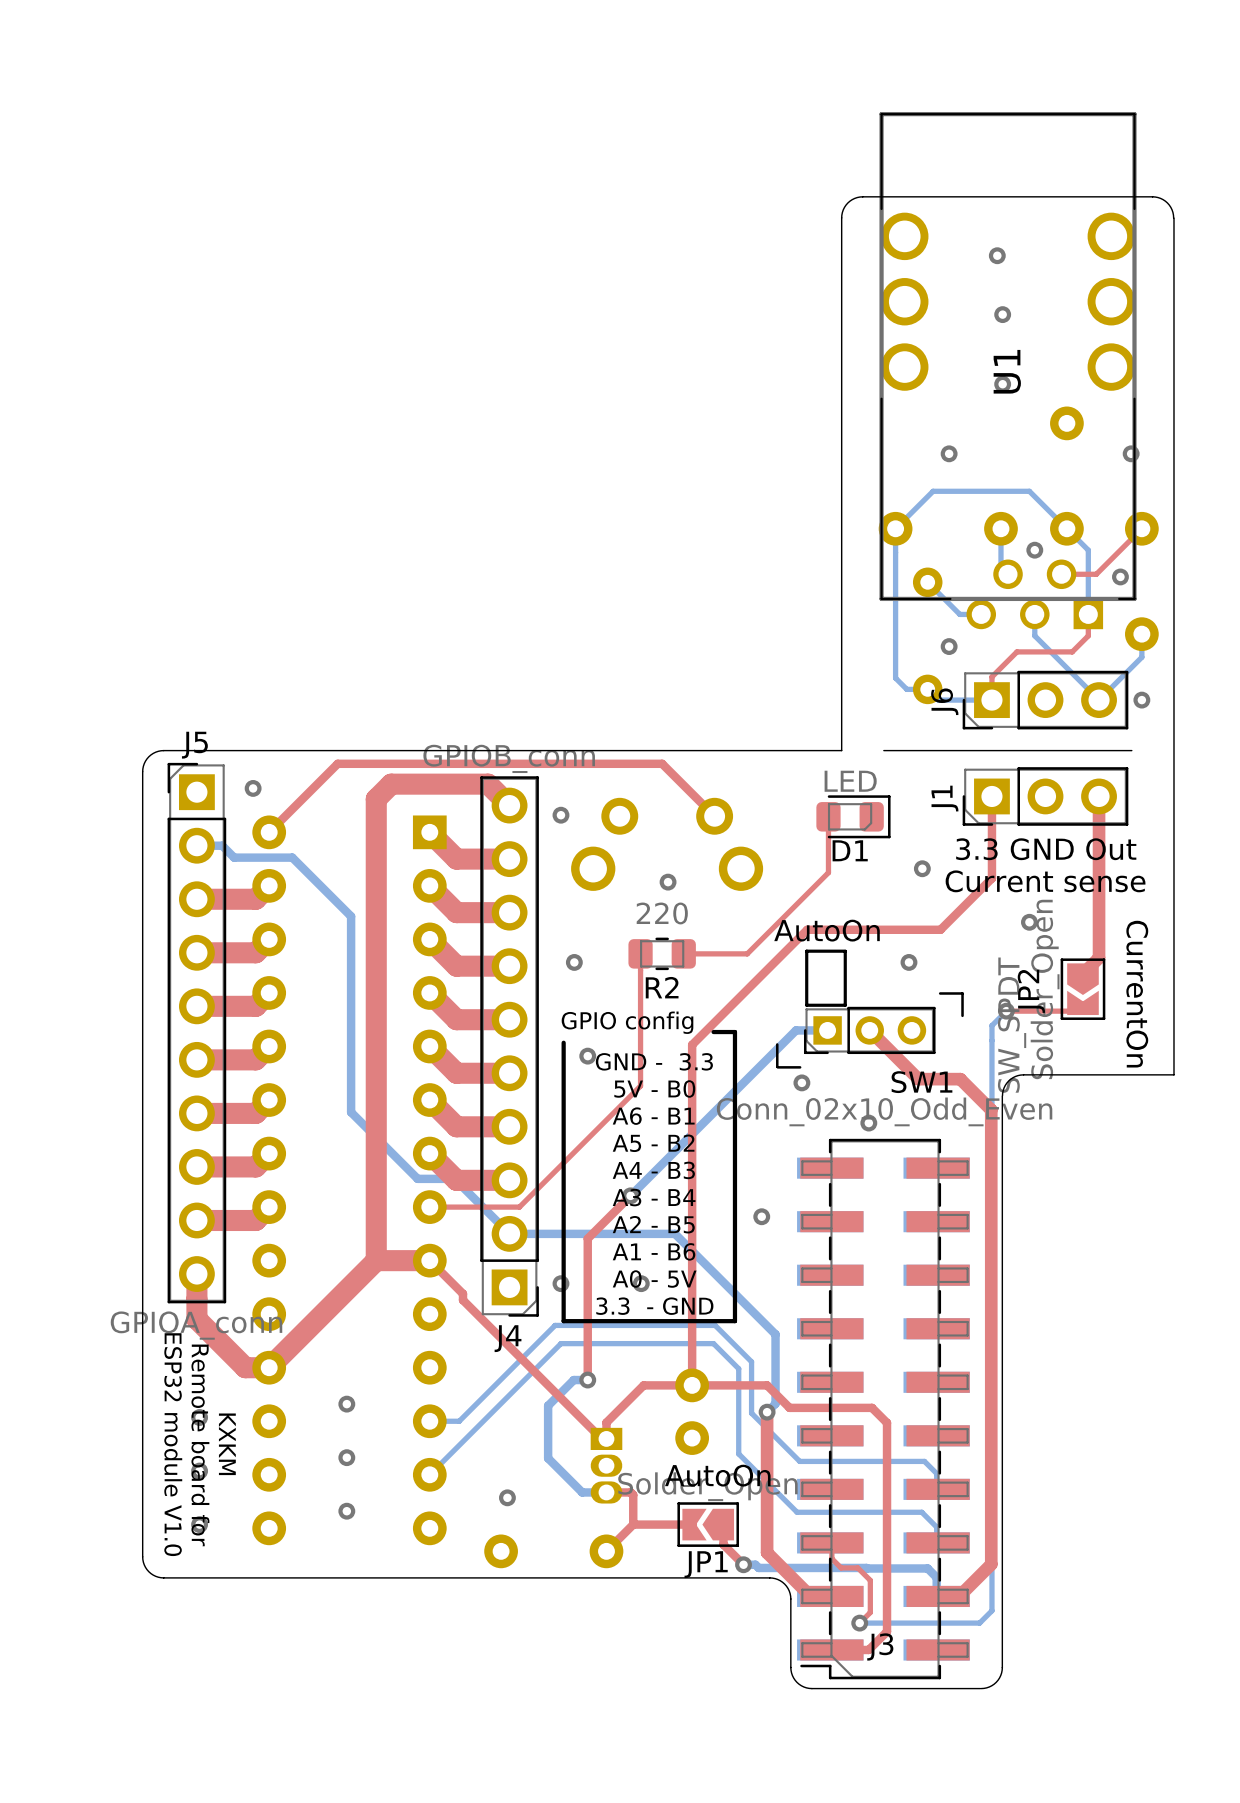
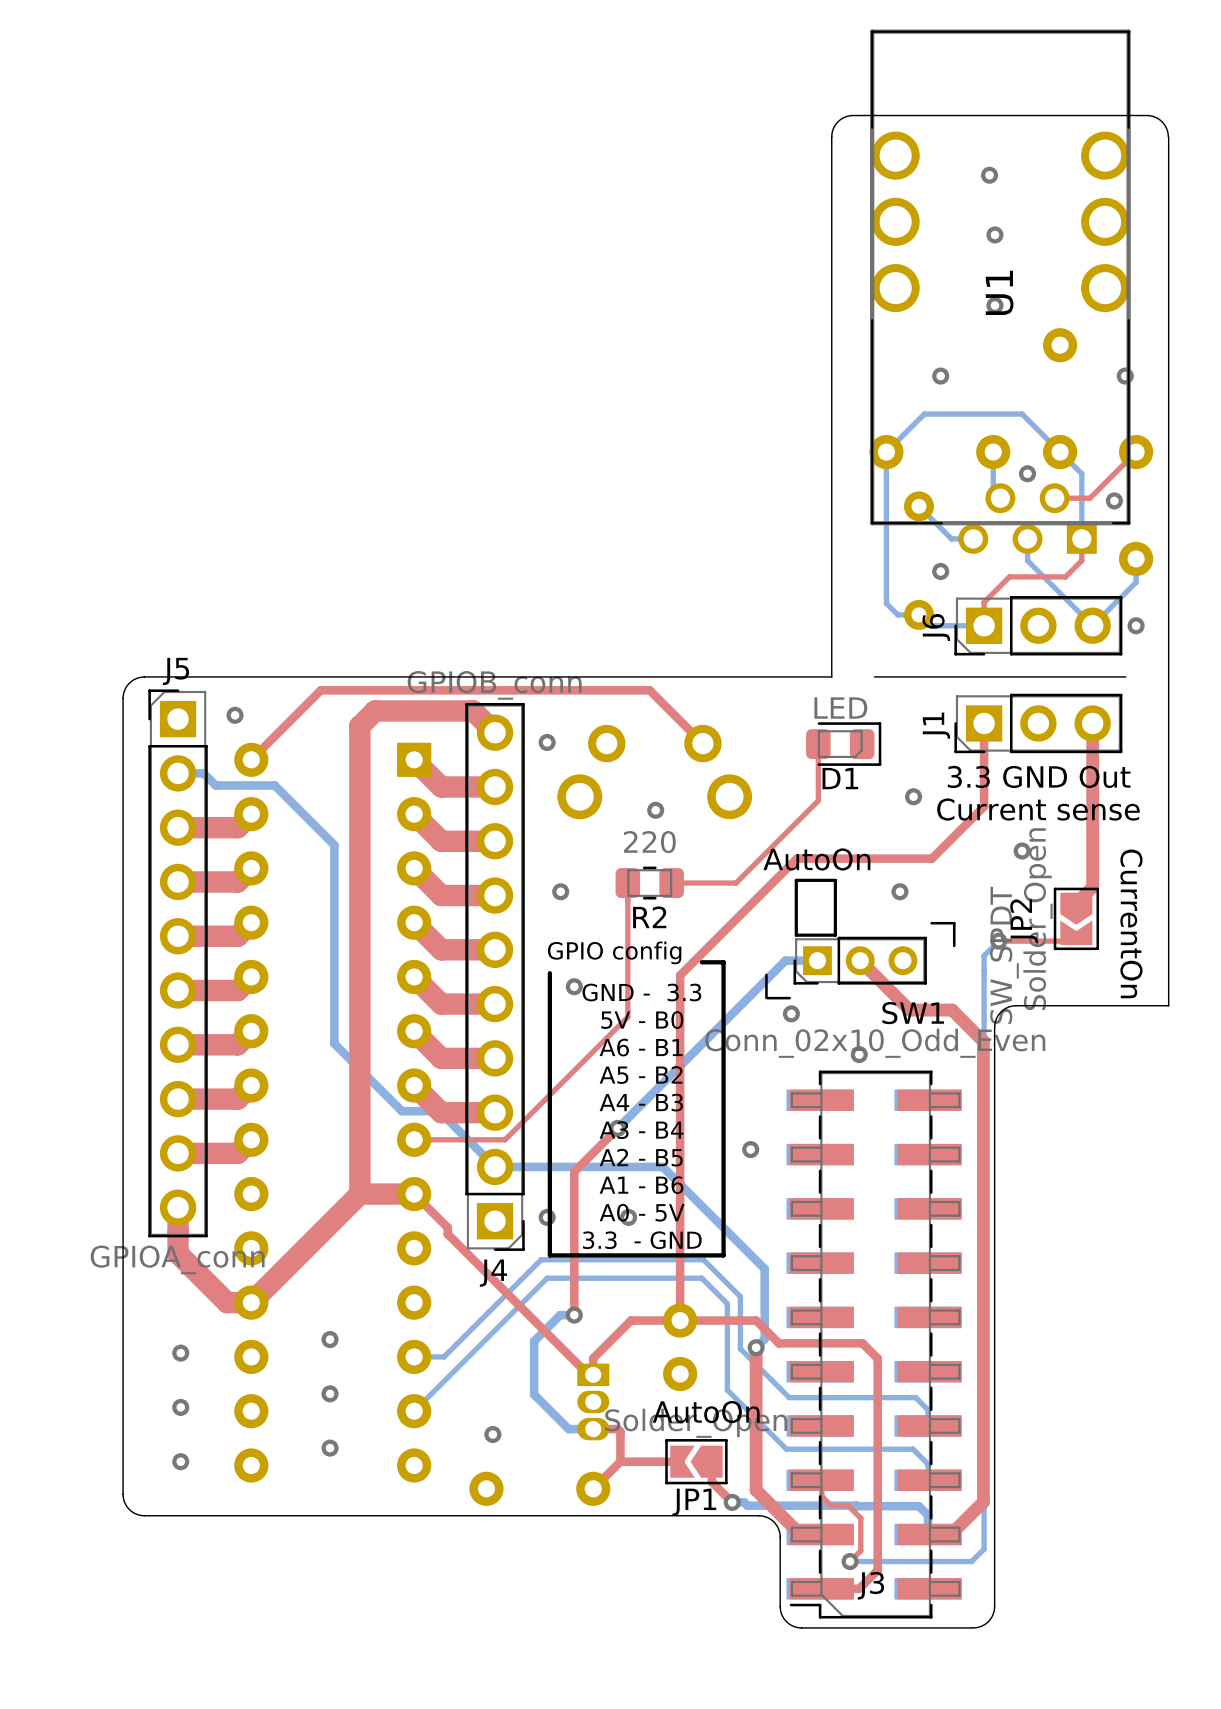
text: ESP32 module V1.0 (173, 1444) -> none
text: KXKM (227, 1444) -> none
text: Remote board for (200, 1445) -> none

